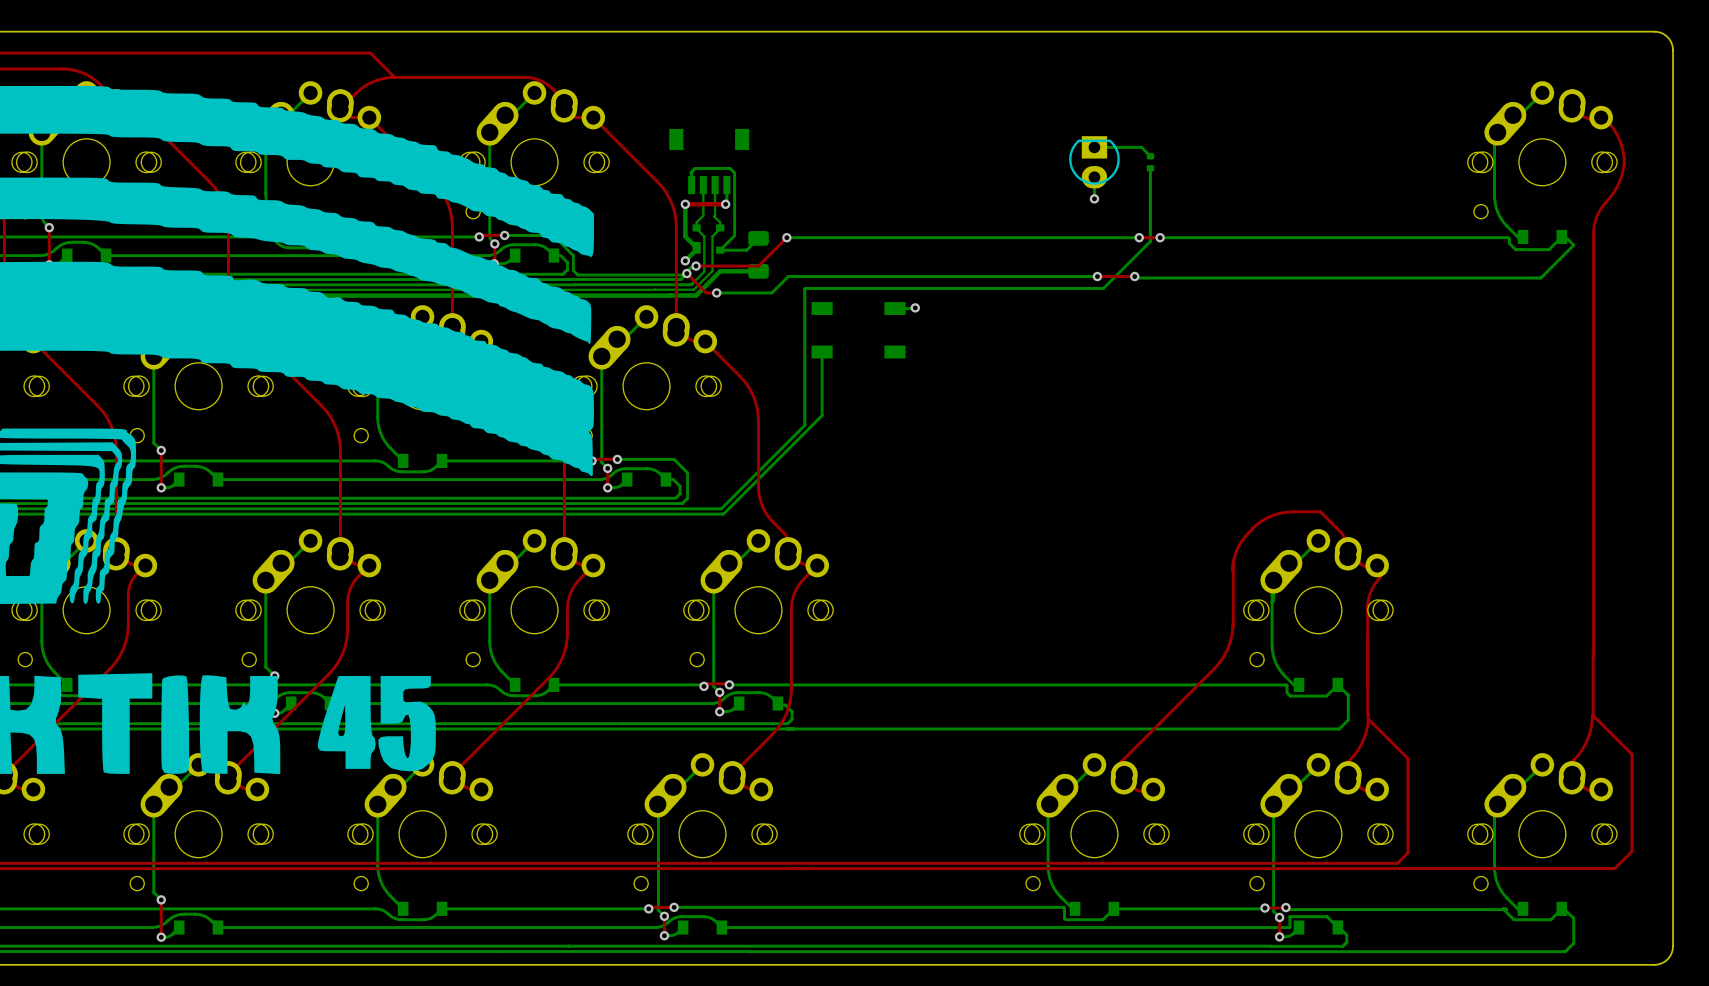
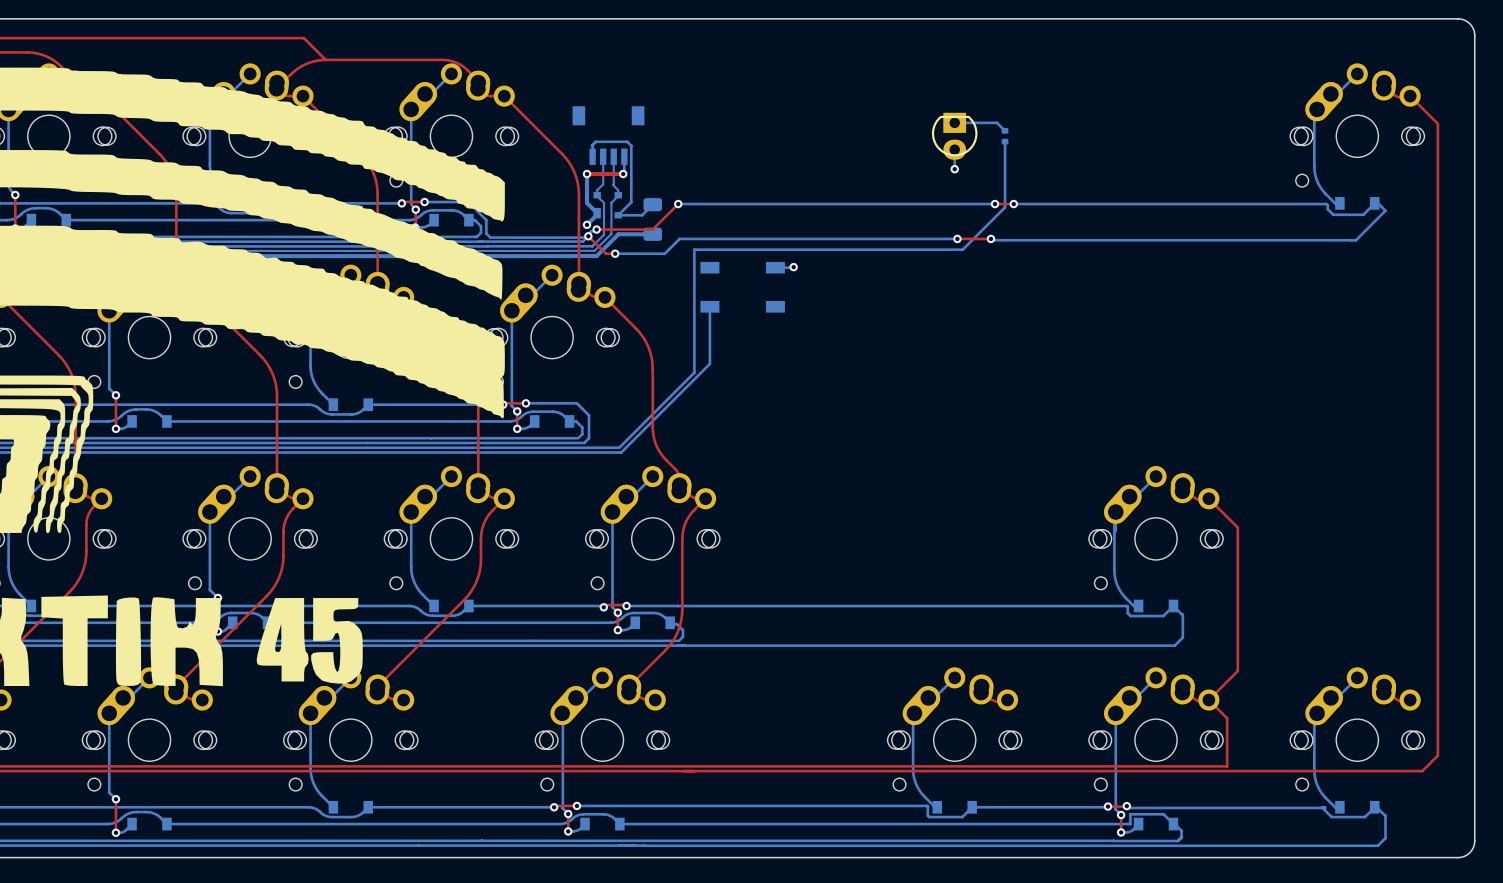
top track: (1601, 117) (1605, 119) (1616, 134) (1623, 152) (1624, 164) -> none
top track: (1624, 157) (1619, 181) (1605, 202) -> none
top track: (1606, 201) (1597, 216) (1593, 233) (1593, 657) -> none
top track: (1349, 554) (1341, 533) (1320, 511) (1287, 512) (1271, 516) (1252, 528) (1236, 550) (1232, 571) -> none
top track: (1233, 560) (1233, 625) -> none
top track: (1377, 565) (1377, 574) (1380, 577) (1370, 591) (1367, 608) -> none
top track: (1367, 606) (1367, 716) -> none
top track: (1232, 623) (1230, 642) (1222, 659) (1120, 762) (1118, 769) (1121, 776) -> none
top track: (1593, 650) (1593, 715) (1631, 754) -> (1410, 96) (1437, 123) (1437, 668)
top track: (1592, 715) (1587, 739) (1570, 765) (1573, 775) -> none
top track: (1349, 760) (1363, 739) (1368, 715) (1368, 719) (1408, 758) (1408, 852) (1397, 863) -> (1208, 498) (1237, 527) (1237, 671) (1208, 700) (1227, 718) (1227, 766)

